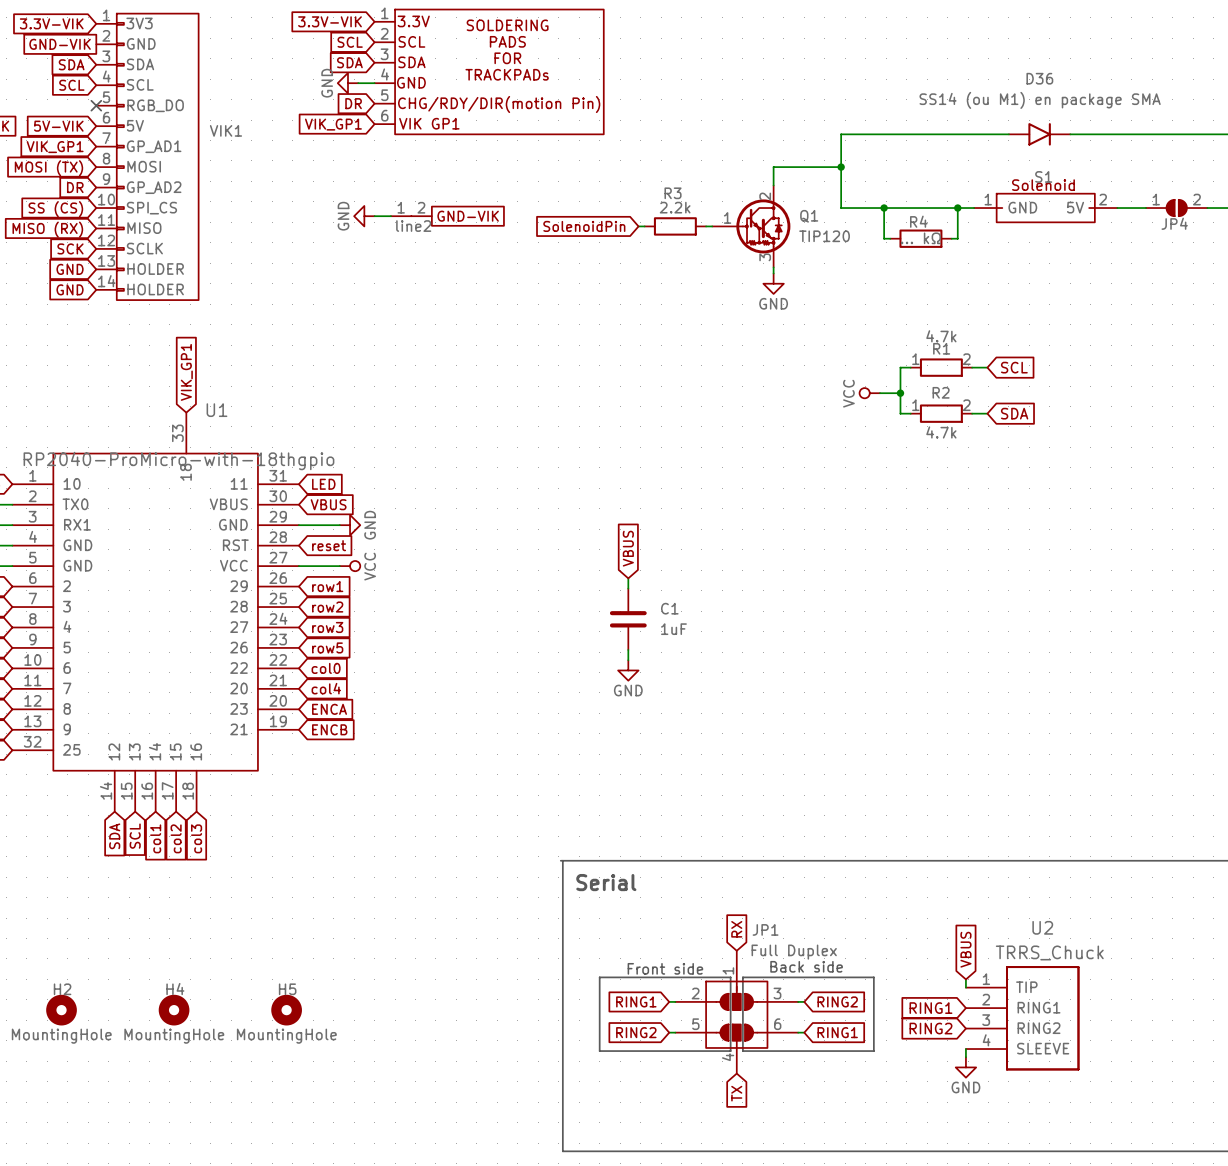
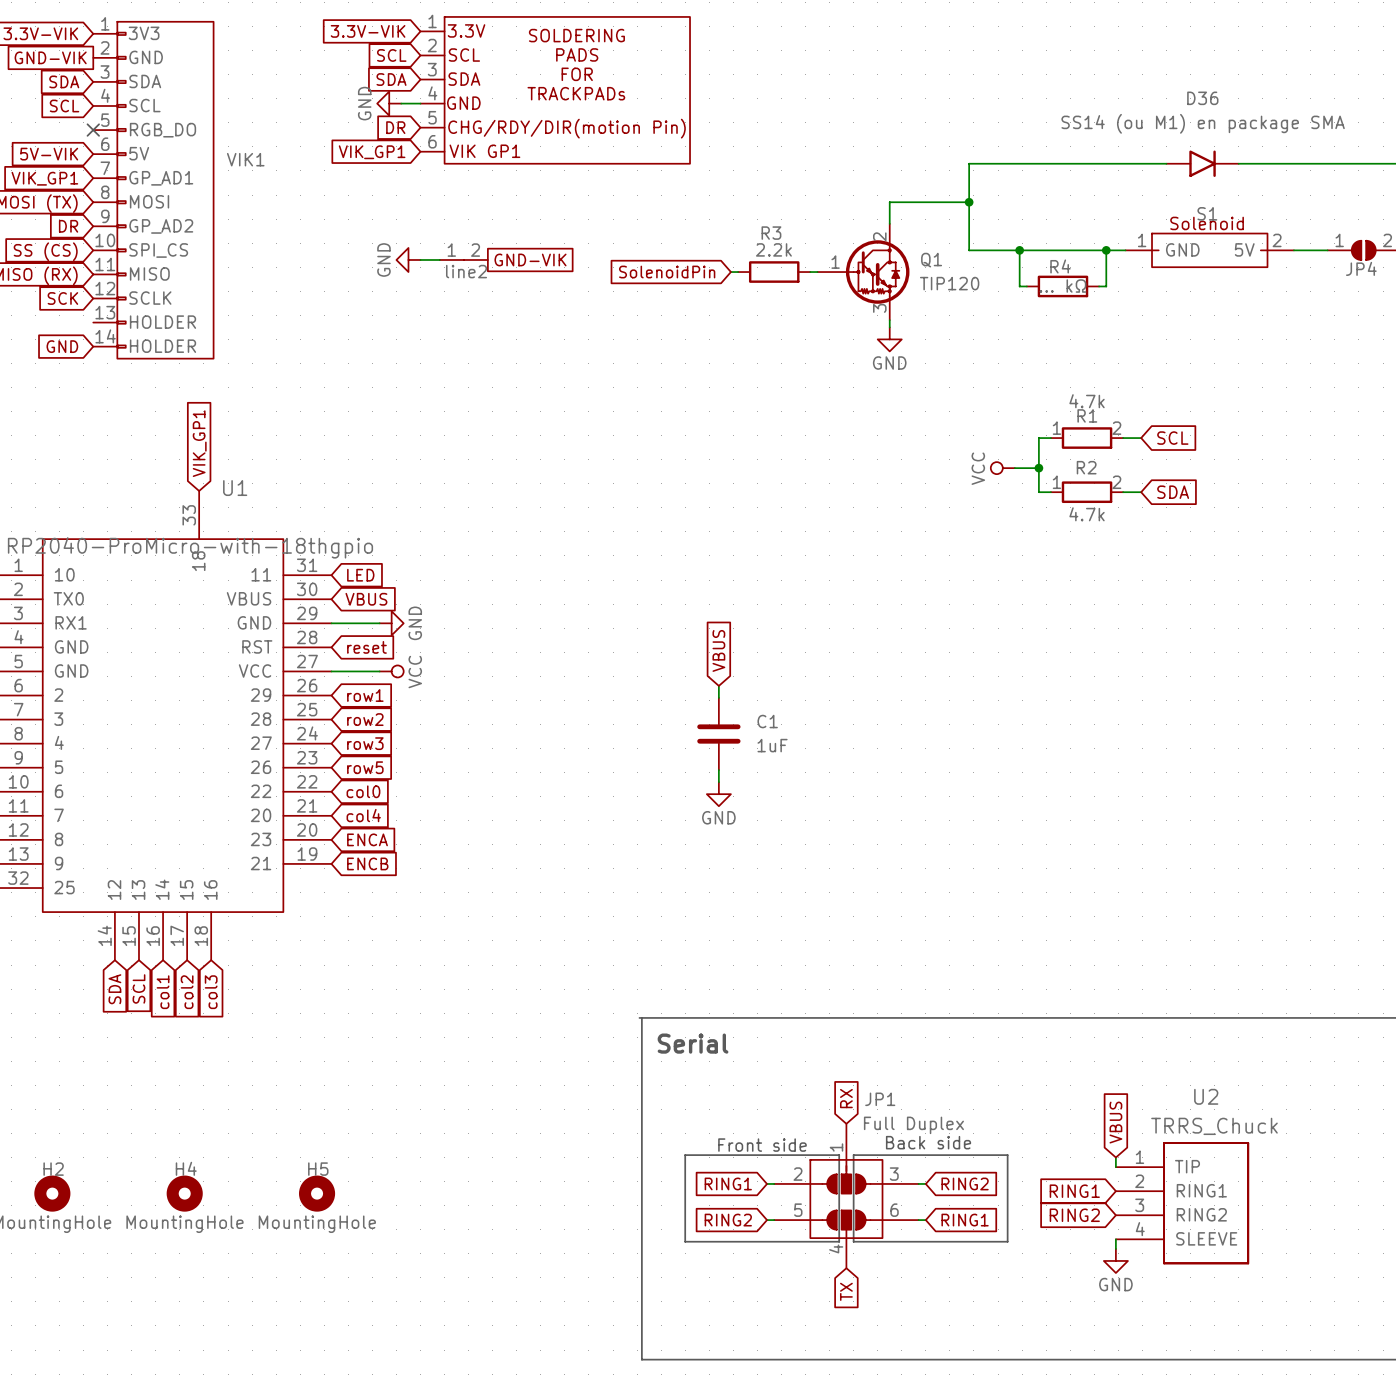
global label: GND (70, 269) -> none

